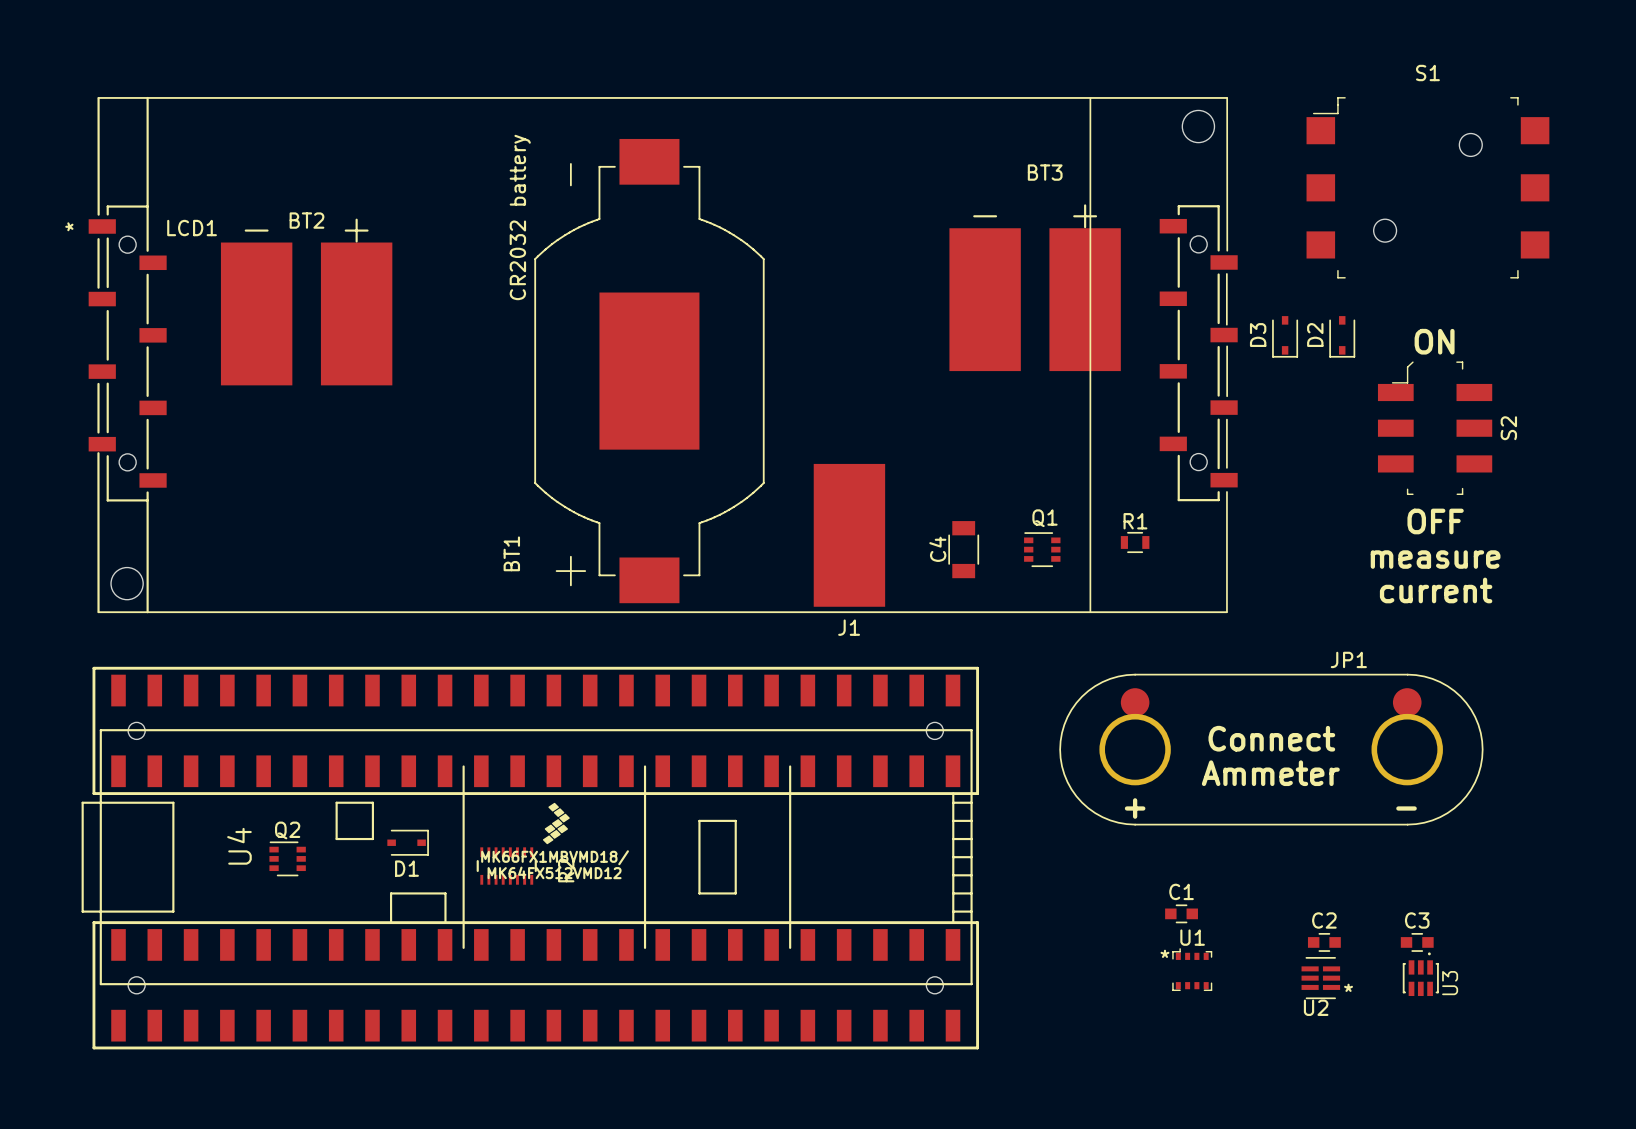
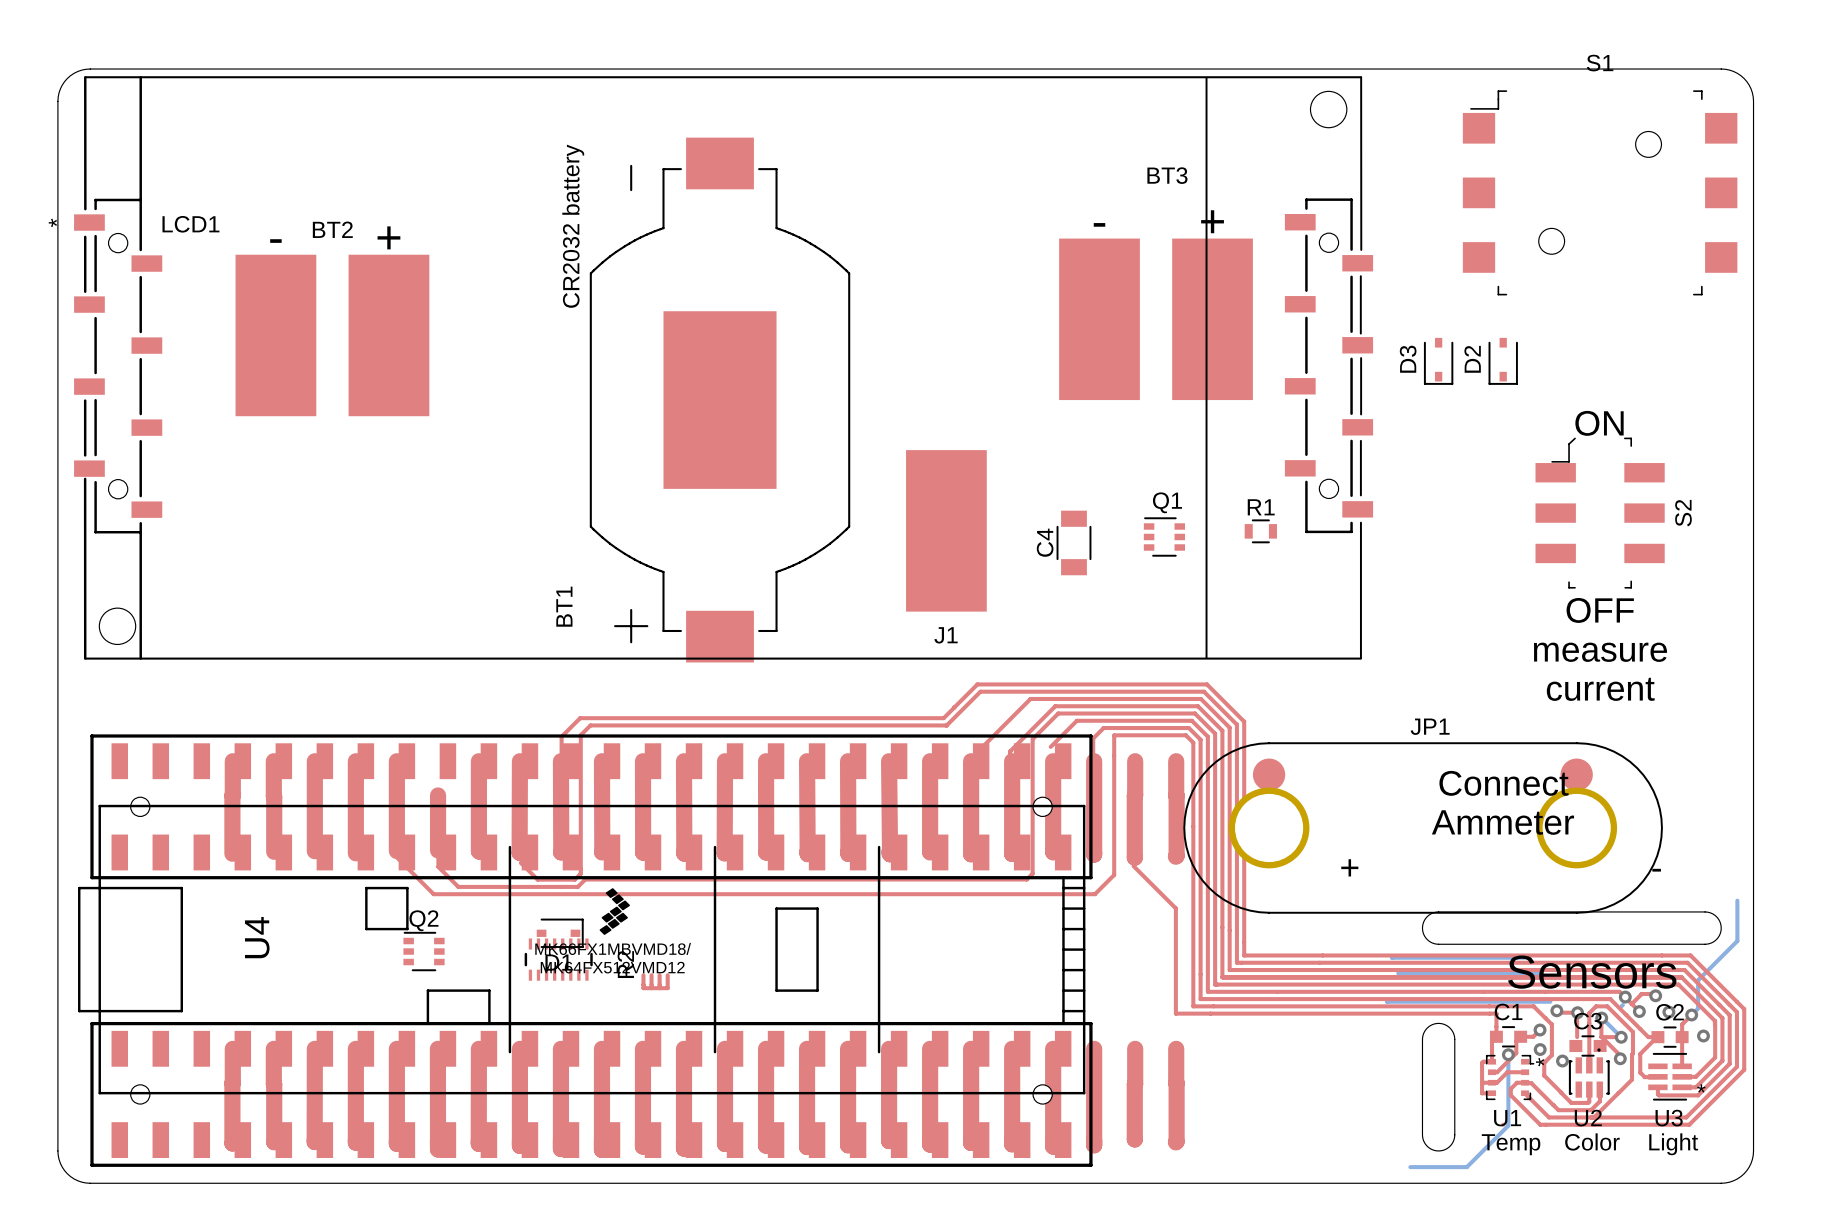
board edge: none -> (90, 69) (1721, 69) (1737, 73) (1749, 85) (1753, 101) (1753, 1150) (1749, 1167) (1737, 1178) (1721, 1183) (90, 1183) (74, 1178) (62, 1167) (57, 1150) (57, 101) (60, 88) (67, 78) (77, 71) (90, 69)
text position: ON (1434, 341) -> ON (1599, 423)
LCD1 position: (663, 355) -> (723, 367)
S2 position: (1435, 428) -> (1600, 513)
text position: OFF (1435, 521) -> OFF (1600, 610)
J1 position: (849, 535) -> (946, 530)
R1 position: (1135, 542) -> (1260, 531)
C4 position: (963, 549) -> (1073, 542)
Q1 position: (1042, 549) -> (1164, 536)
text position: measure (1435, 559) -> measure (1600, 652)
text position: current (1436, 590) -> current (1600, 689)
JP1 name position: JP1 (1348, 659) -> JP1 (1430, 726)
top track: none -> (1114, 735) (1185, 735) (1193, 742) (1193, 1006) (1533, 1006) (1551, 1024) (1551, 1055) (1544, 1062) (1544, 1075) (1561, 1092)
top track: none -> (1114, 735) (1114, 874) (1094, 894) (433, 894) (395, 855)
top track: none -> (1032, 739) (1058, 713) (1194, 713) (1215, 733) (1215, 984) (1678, 984) (1714, 1020) (1714, 1025)
top track: none -> (1032, 739) (1032, 873) (1026, 879) (585, 879) (577, 886) (458, 886) (438, 866) (438, 852)
top track: none -> (1050, 746) (1076, 720) (1191, 720) (1207, 736) (1207, 991) (1619, 991) (1639, 1011)
top track: none -> (1010, 754) (1010, 751) (1055, 706) (1197, 706) (1222, 730) (1222, 977) (1681, 977) (1722, 1018) (1722, 1060) (1695, 1087) (1682, 1087)
top track: none -> (970, 758) (1030, 698) (1200, 698) (1229, 727) (1229, 970) (1684, 970) (1729, 1015) (1729, 1063) (1698, 1095) (1659, 1095) (1657, 1087)
top track: none -> (232, 761) (232, 853)
top track: none -> (273, 761) (274, 851)
top track: none -> (314, 761) (314, 851)
top track: none -> (355, 761) (355, 853)
top track: none -> (396, 761) (396, 851)
top track: none -> (478, 761) (479, 851)
top track: none -> (519, 761) (519, 852)
top track: none -> (560, 761) (560, 852)
top track: none -> (601, 761) (601, 852)
top track: none -> (642, 761) (643, 852)
top track: none -> (684, 761) (684, 852)
top track: none -> (725, 761) (725, 852)
top track: none -> (766, 761) (766, 852)
top track: none -> (807, 761) (807, 854) (807, 852)
top track: none -> (848, 761) (848, 853) (848, 852)
top track: none -> (889, 761) (890, 854) (889, 852)
top track: none -> (930, 761) (930, 852)
top track: none -> (971, 761) (971, 854)
top track: none -> (1012, 761) (1012, 853)
top track: none -> (1053, 761) (1053, 852)
top track: none -> (1094, 761) (1094, 854)
top track: none -> (1135, 761) (1134, 857)
top track: none -> (1176, 761) (1175, 856)
top track: none -> (1093, 763) (1093, 738) (1103, 728) (1188, 728) (1200, 739) (1200, 999) (1610, 999) (1648, 1037) (1657, 1037)
top track: none -> (561, 766) (561, 736) (580, 718) (943, 718) (977, 684) (1206, 684) (1244, 721) (1244, 955) (1690, 955) (1744, 1009) (1744, 1069) (1689, 1124) (1540, 1124) (1510, 1095) (1510, 1088) (1517, 1082) (1525, 1082)
top track: none -> (438, 795) (438, 850)
text position: Connect (1271, 738) -> Connect (1503, 783)
top track: none -> (521, 853) (521, 863) (537, 879) (574, 879) (580, 873) (580, 735) (590, 725) (946, 725) (980, 691) (1203, 691) (1236, 724) (1236, 962) (1687, 962) (1736, 1012) (1736, 1066) (1686, 1117) (1549, 1117) (1525, 1093)
text position: Ammeter (1270, 773) -> Ammeter (1502, 822)
top track: none -> (1133, 866) (1175, 908) (1175, 1013)
text position: + (1135, 808) -> + (1349, 867)
text position: - (1406, 808) -> - (1656, 870)
bottom track: none -> (1737, 900) (1737, 941) (1698, 980) (1698, 1008) (1691, 1014)
board edge: none -> (1438, 911) (1705, 911) (1716, 916) (1721, 928) (1716, 939) (1705, 944) (1438, 944) (1427, 939) (1422, 928) (1427, 916) (1438, 911)
D1 position: (408, 842) -> (560, 933)
Q2 position: (287, 858) -> (424, 951)
bottom track: none -> (1523, 957) (1392, 958)
text: none -> Sensors (1592, 972)
bottom track: none -> (1398, 973) (1539, 973)
top track: none -> (643, 975) (643, 988) (667, 988) (667, 975)
top track: none -> (651, 975) (651, 988)
top track: none -> (659, 975) (659, 988)
top track: none -> (1656, 994) (1641, 994) (1631, 1003)
via: none -> (1655, 995)
via: none -> (1625, 997)
bottom track: none -> (1387, 1001) (1550, 1001)
bottom track: none -> (1622, 1004) (1621, 1006)
top track: none -> (1556, 1010) (1558, 1012) (1577, 1012) (1577, 1037)
via: none -> (1556, 1010)
via: none -> (1639, 1011)
via: none -> (1668, 1012)
top track: none -> (1175, 1013) (1496, 1013) (1496, 1036)
C1 position: (1181, 913) -> (1508, 1036)
via: none -> (1577, 1012)
top track: none -> (1691, 1014) (1682, 1024) (1682, 1066)
via: none -> (1691, 1014)
top track: none -> (1601, 1018) (1601, 1037) (1621, 1037)
bottom track: none -> (1602, 1018) (1621, 1037)
via: none -> (1601, 1018)
top track: none -> (1715, 1021) (1715, 1057) (1695, 1076) (1682, 1076)
top track: none -> (1540, 1030) (1533, 1036) (1520, 1036)
via: none -> (1540, 1030)
via: none -> (1703, 1035)
top track: none -> (1492, 1037) (1492, 1061)
top track: none -> (1520, 1036) (1516, 1040) (1516, 1053) (1497, 1072) (1492, 1072)
top track: none -> (1601, 1037) (1620, 1055) (1620, 1058)
via: none -> (1621, 1037)
top track: none -> (1657, 1036) (1640, 1053) (1640, 1072) (1644, 1077) (1657, 1077)
board edge: none -> (1422, 1039) (1422, 1136) (1428, 1147) (1440, 1150) (1450, 1146) (1454, 1136) (1454, 1037) (1450, 1028) (1438, 1023) (1427, 1028) (1422, 1039)
U1 name position: U1 (1192, 937) -> U1 (1507, 1118)
C2 position: (1324, 942) -> (1670, 1037)
top track: none -> (232, 1048) (232, 1143)
top track: none -> (273, 1048) (274, 1142)
top track: none -> (314, 1048) (314, 1142) (314, 1140)
top track: none -> (355, 1048) (355, 1142)
top track: none -> (396, 1048) (396, 1143)
top track: none -> (437, 1048) (438, 1149) (437, 1140)
top track: none -> (478, 1048) (478, 1143) (478, 1140)
top track: none -> (519, 1048) (519, 1145)
top track: none -> (560, 1048) (560, 1149)
top track: none -> (601, 1048) (601, 1149)
top track: none -> (642, 1048) (642, 1146)
top track: none -> (684, 1048) (684, 1148)
top track: none -> (725, 1048) (725, 1144)
top track: none -> (766, 1048) (766, 1145)
top track: none -> (807, 1048) (807, 1147)
top track: none -> (848, 1048) (848, 1145)
top track: none -> (889, 1048) (889, 1141)
top track: none -> (930, 1048) (930, 1144)
top track: none -> (971, 1048) (971, 1143)
top track: none -> (1012, 1048) (1012, 1144)
top track: none -> (1053, 1048) (1053, 1146)
top track: none -> (1094, 1048) (1094, 1145)
top track: none -> (1135, 1048) (1134, 1139)
top track: none -> (1176, 1048) (1175, 1142)
via: none -> (1540, 1049)
U1 footprint: [1172, 948, 1213, 992] -> [1485, 1054, 1535, 1101]
bottom track: none -> (1508, 1054) (1508, 1125) (1466, 1167) (1410, 1167)
via: none -> (1508, 1054)
U3 footprint: [1402, 952, 1439, 997] -> [1648, 1052, 1692, 1101]
via: none -> (1620, 1058)
via: none -> (1562, 1061)
top track: none -> (1491, 1061) (1482, 1062) (1482, 1093) (1491, 1093)
U2 footprint: [1301, 957, 1341, 1000] -> [1568, 1048, 1610, 1098]
top track: none -> (1589, 1065) (1589, 1013) (1596, 1006) (1607, 1006) (1632, 1031) (1632, 1079) (1618, 1093)
top track: none -> (1524, 1072) (1507, 1072) (1497, 1082) (1491, 1082)
top track: none -> (1523, 1083) (1531, 1083) (1553, 1105)
top track: none -> (1589, 1089) (1588, 1102) (1571, 1102) (1561, 1092)
top track: none -> (1599, 1090) (1599, 1101) (1591, 1110) (1558, 1110) (1553, 1105)
U3 name position: U3 (1450, 983) -> U3 (1669, 1118)
top track: none -> (1618, 1093) (1594, 1117)
text: none -> Color (1592, 1141)
text: none -> Temp (1511, 1144)
text: none -> Light (1673, 1144)

